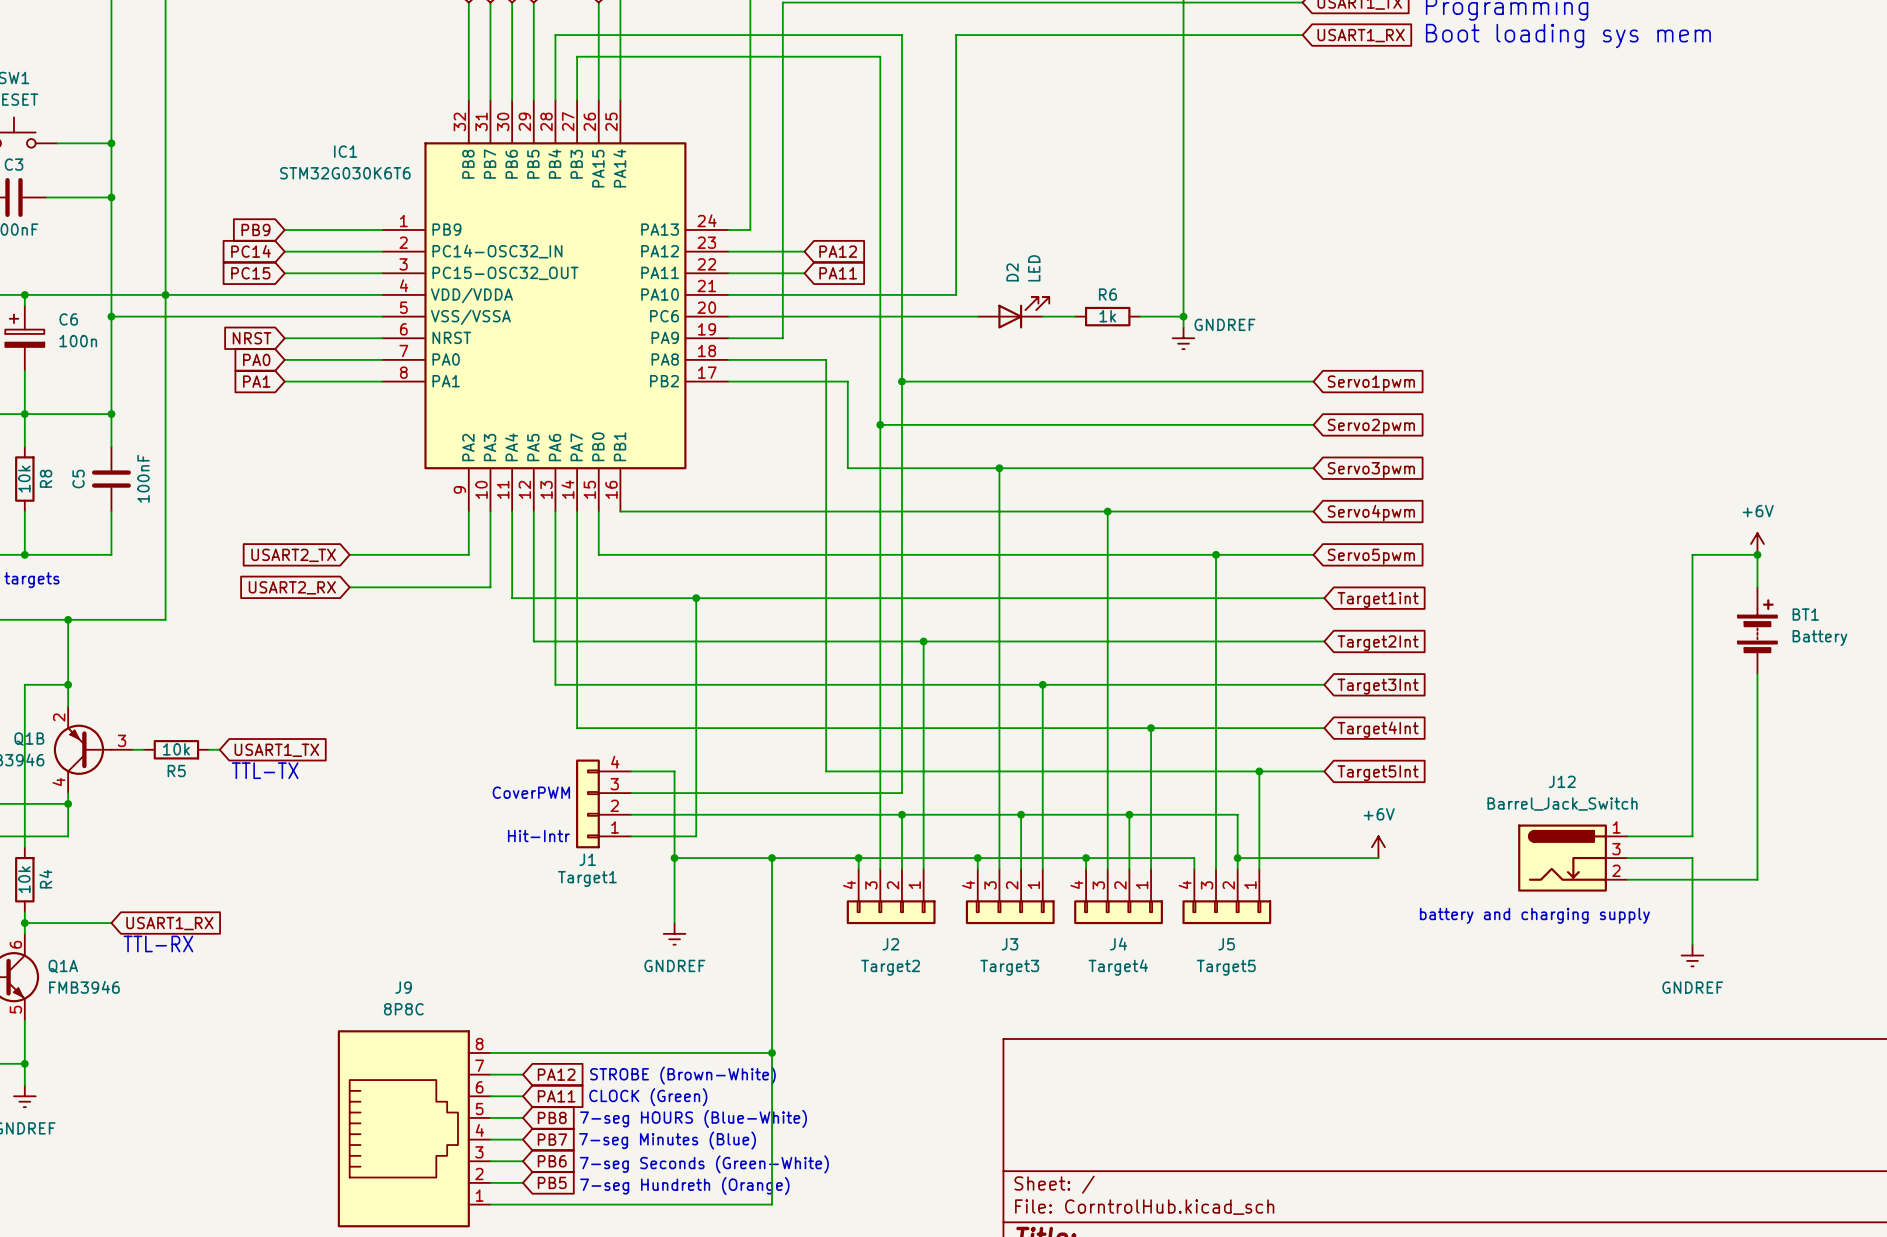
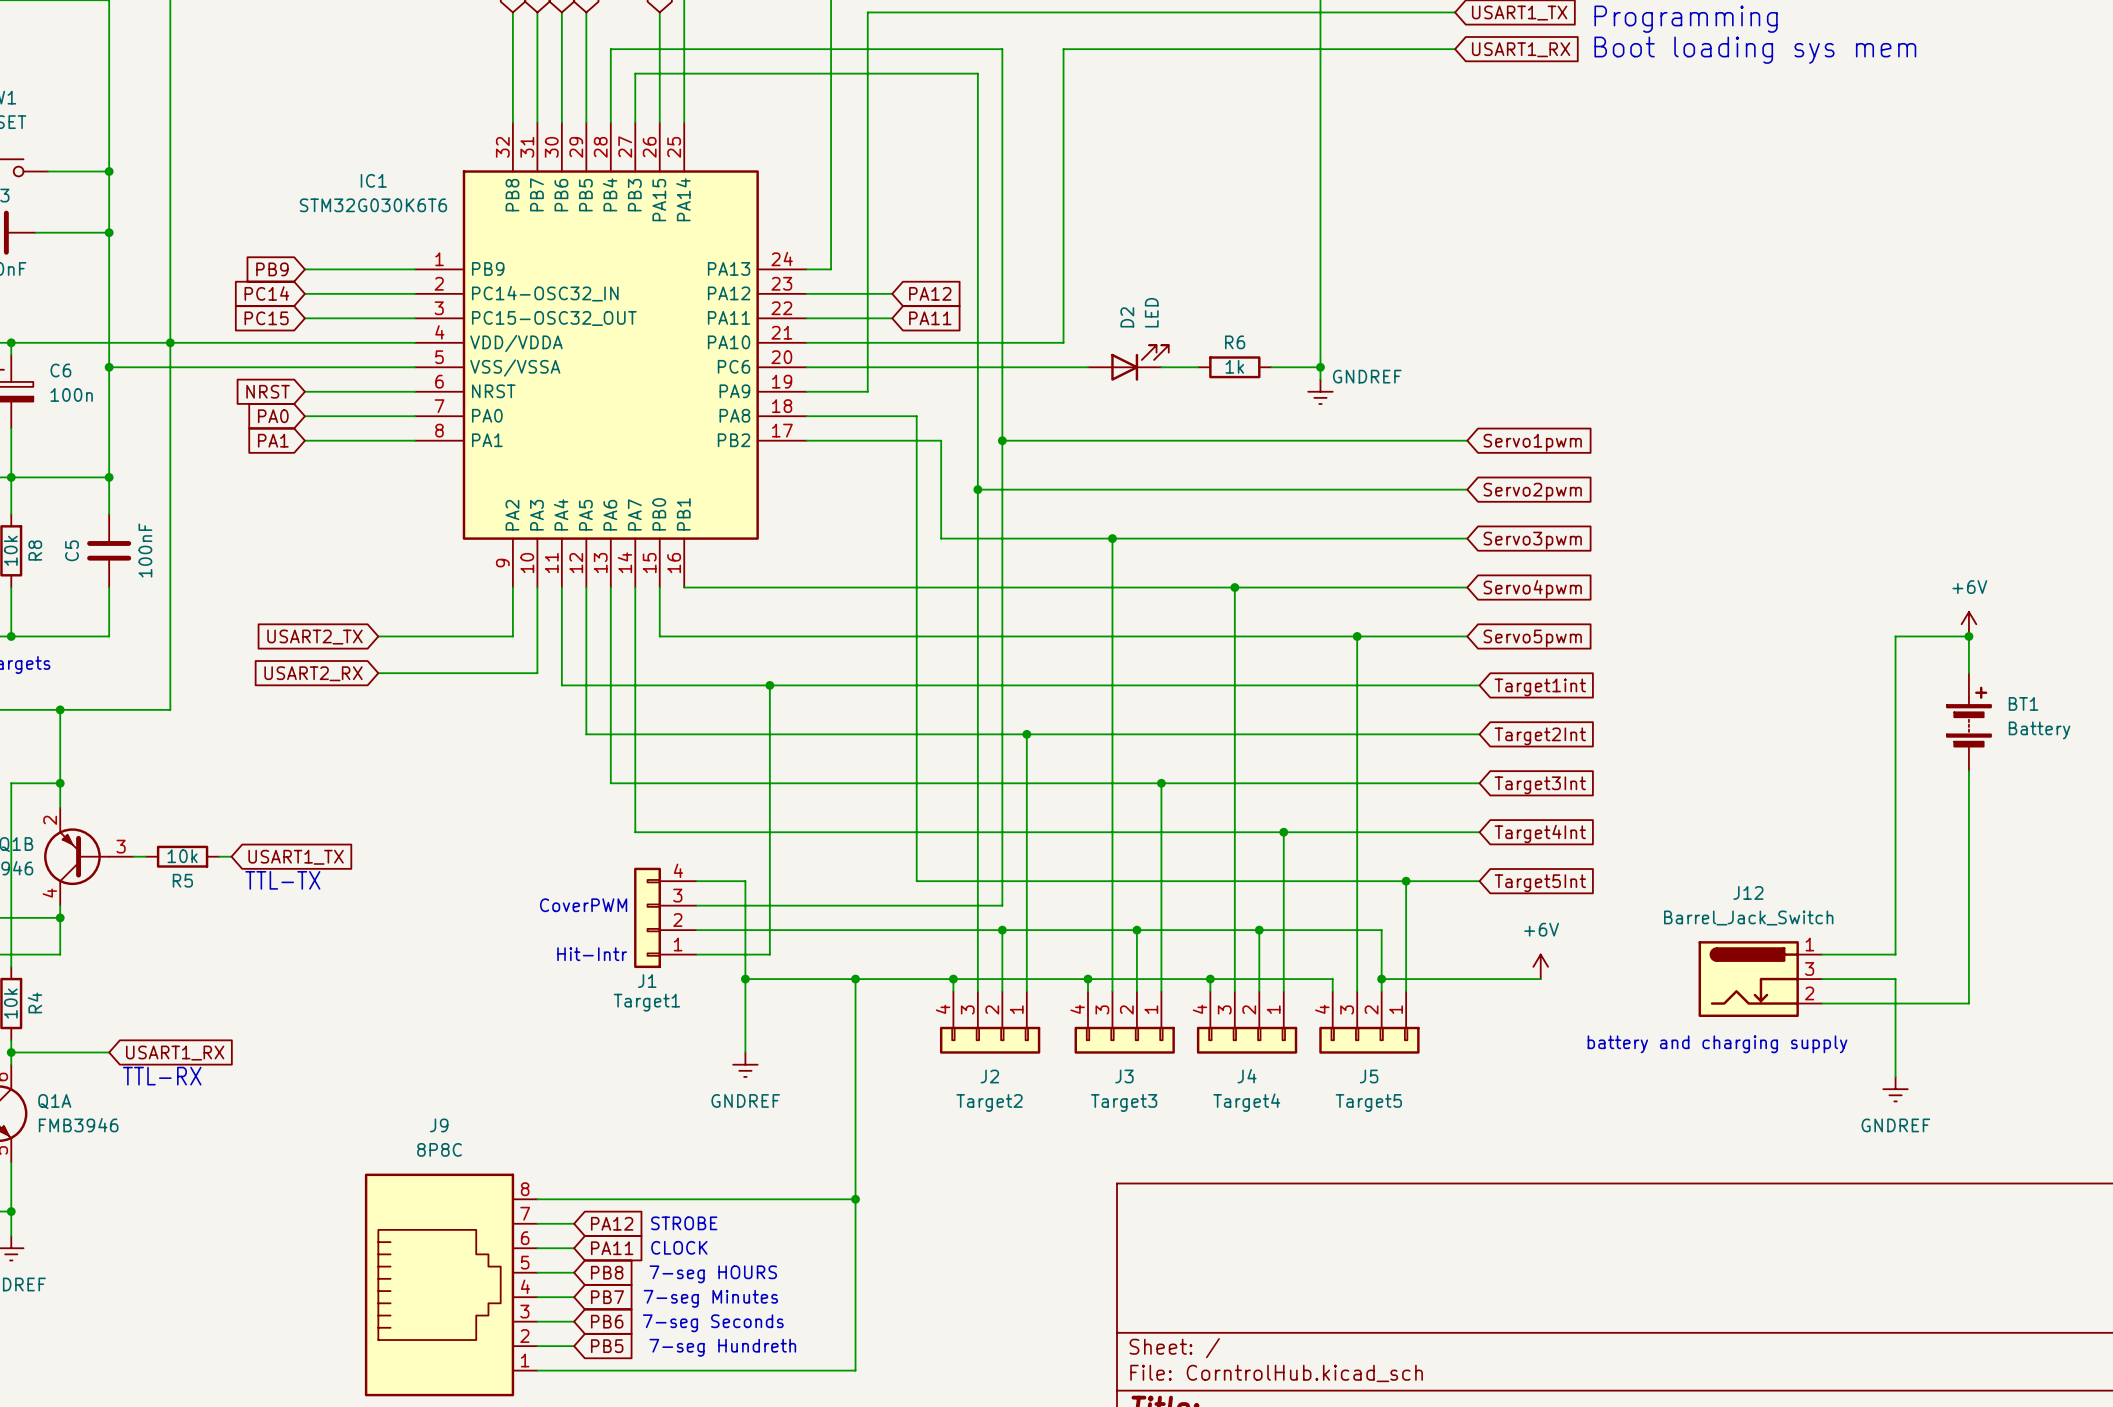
text: none -> STROBE (684, 1223)
text: STROBE (Brown-White) (682, 1075) -> none
text: none -> CLOCK (679, 1247)
text: CLOCK (Green) (648, 1097) -> none
text: 7-seg HOURS (Blue-White) (693, 1118) -> 7-seg HOURS (713, 1274)
text: 7-seg Minutes (Blue) (667, 1140) -> 7-seg Minutes (710, 1298)
text: 7-seg Seconds (Green-White) (704, 1164) -> 7-seg Seconds (713, 1323)
text: 7-seg Hundreth (Orange) (684, 1186) -> 7-seg Hundreth (722, 1347)

